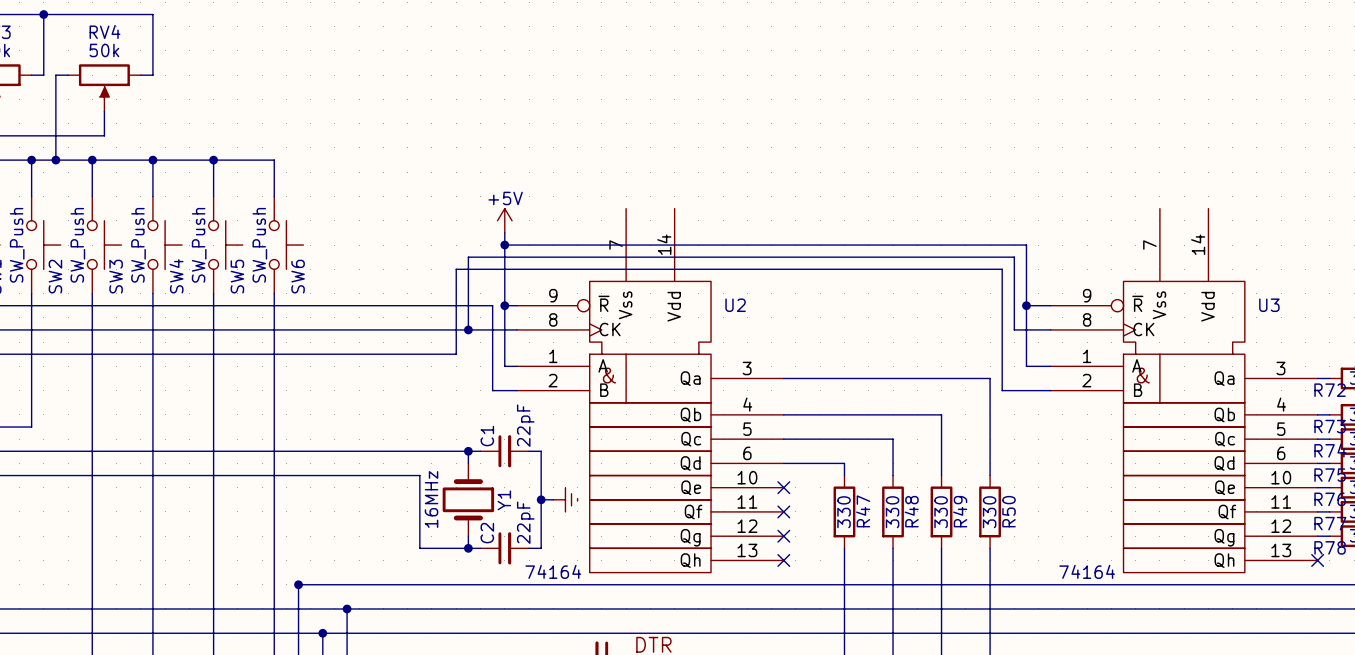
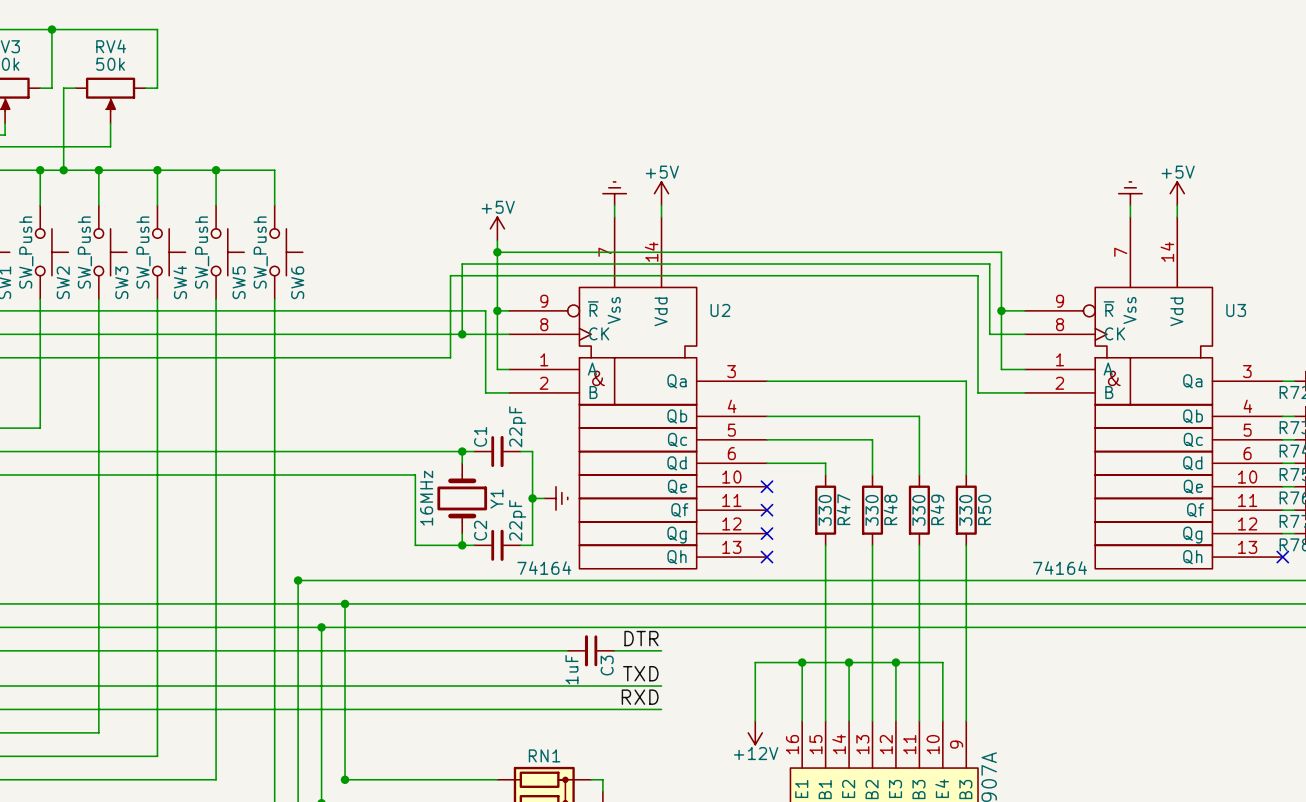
power symbol: none -> (614, 193)
power symbol: none -> +5V (661, 193)
power symbol: none -> (1130, 193)
power symbol: none -> +5V (1177, 193)
wire: none -> (614, 205) (614, 217)
wire: none -> (661, 205) (661, 217)
wire: none -> (1130, 205) (1130, 217)
wire: none -> (1177, 205) (1177, 217)

